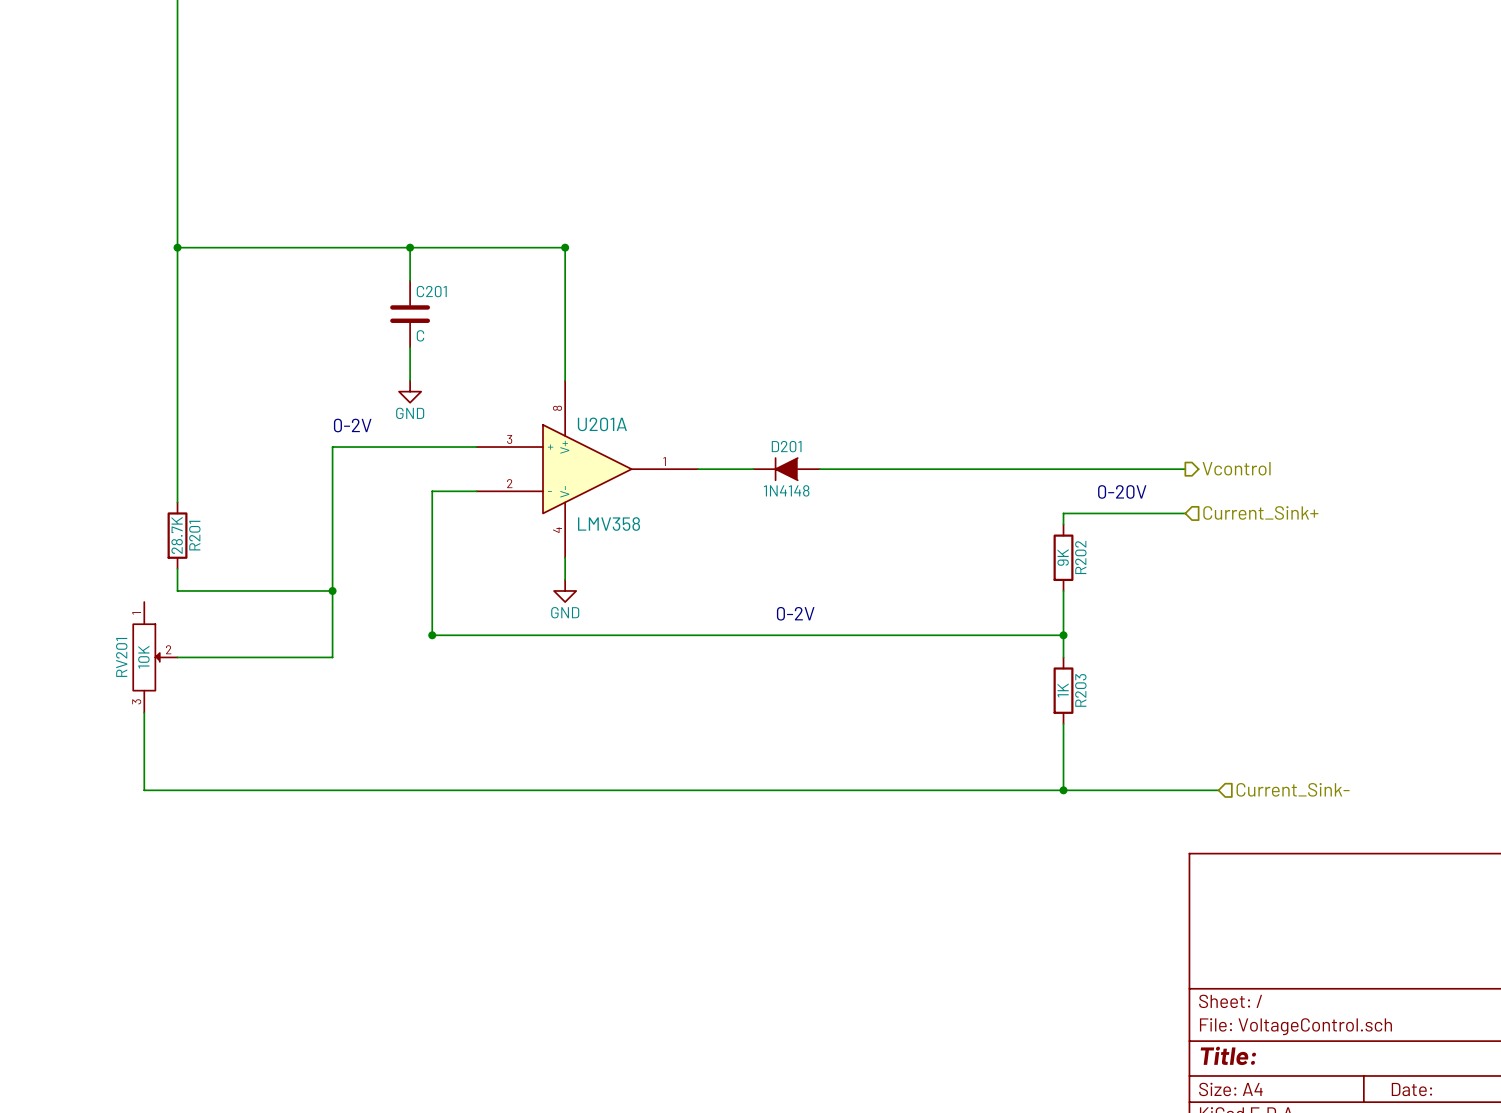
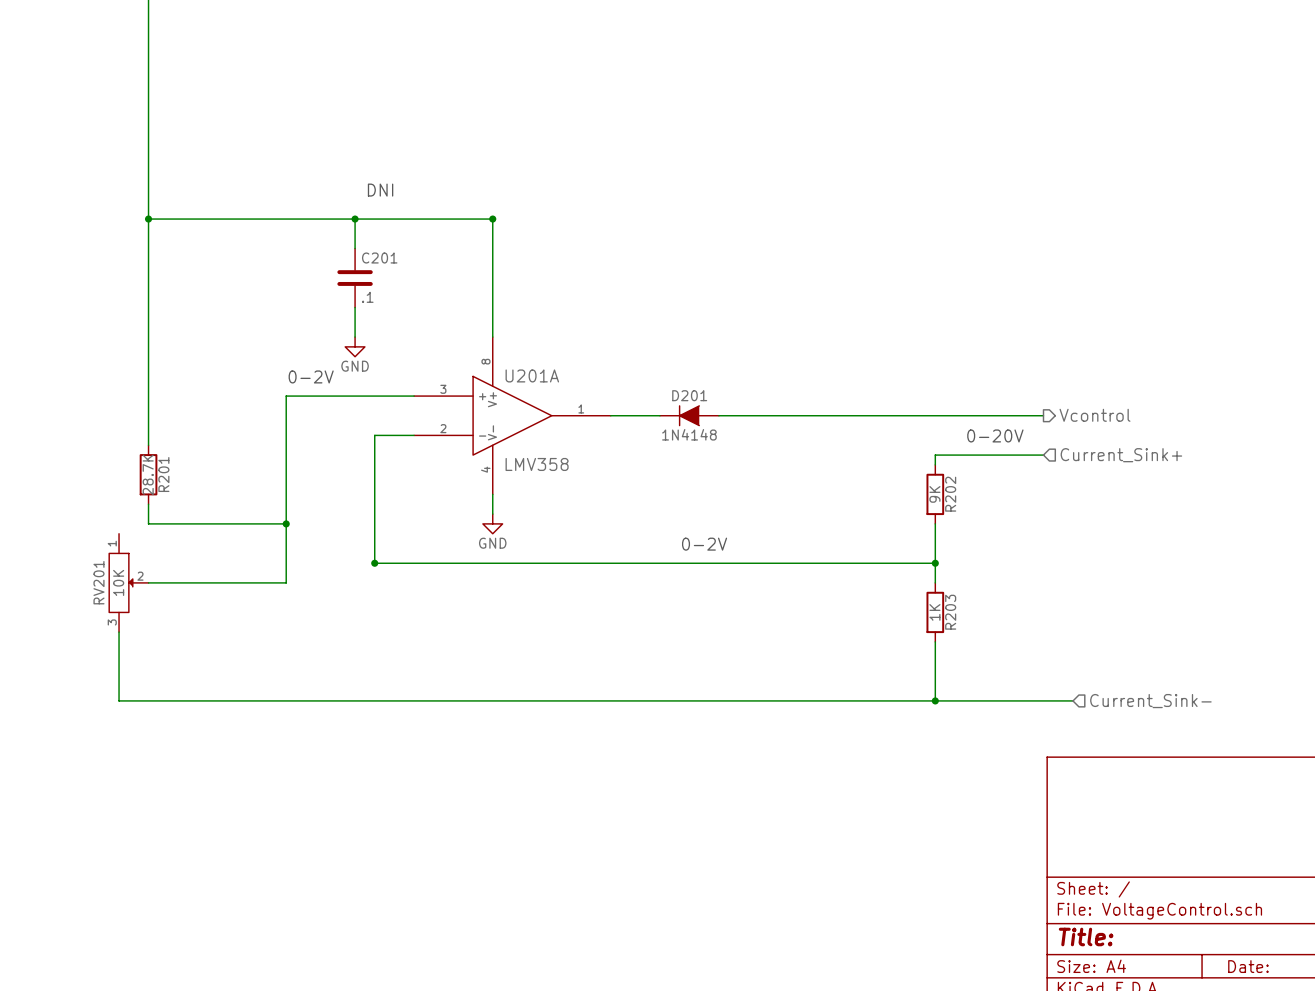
text: none -> DNI (380, 190)
C201 value: C (420, 335) -> .1 (367, 297)

